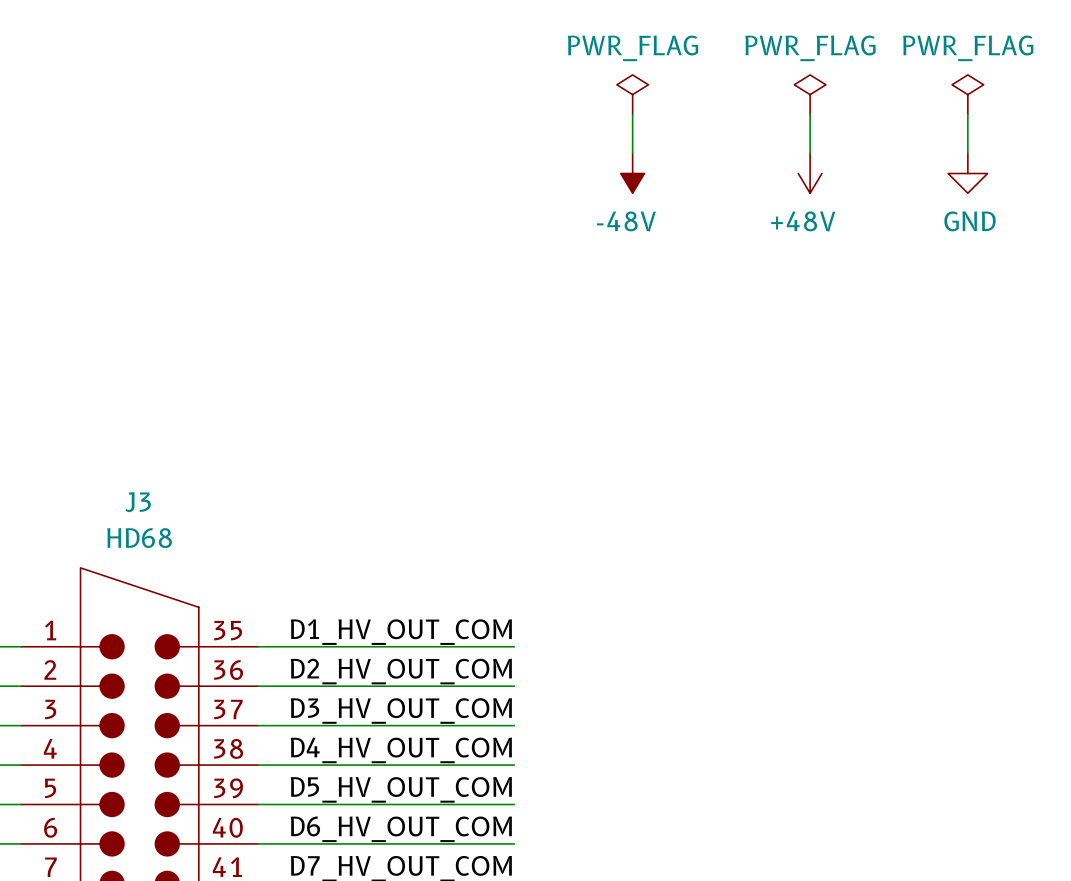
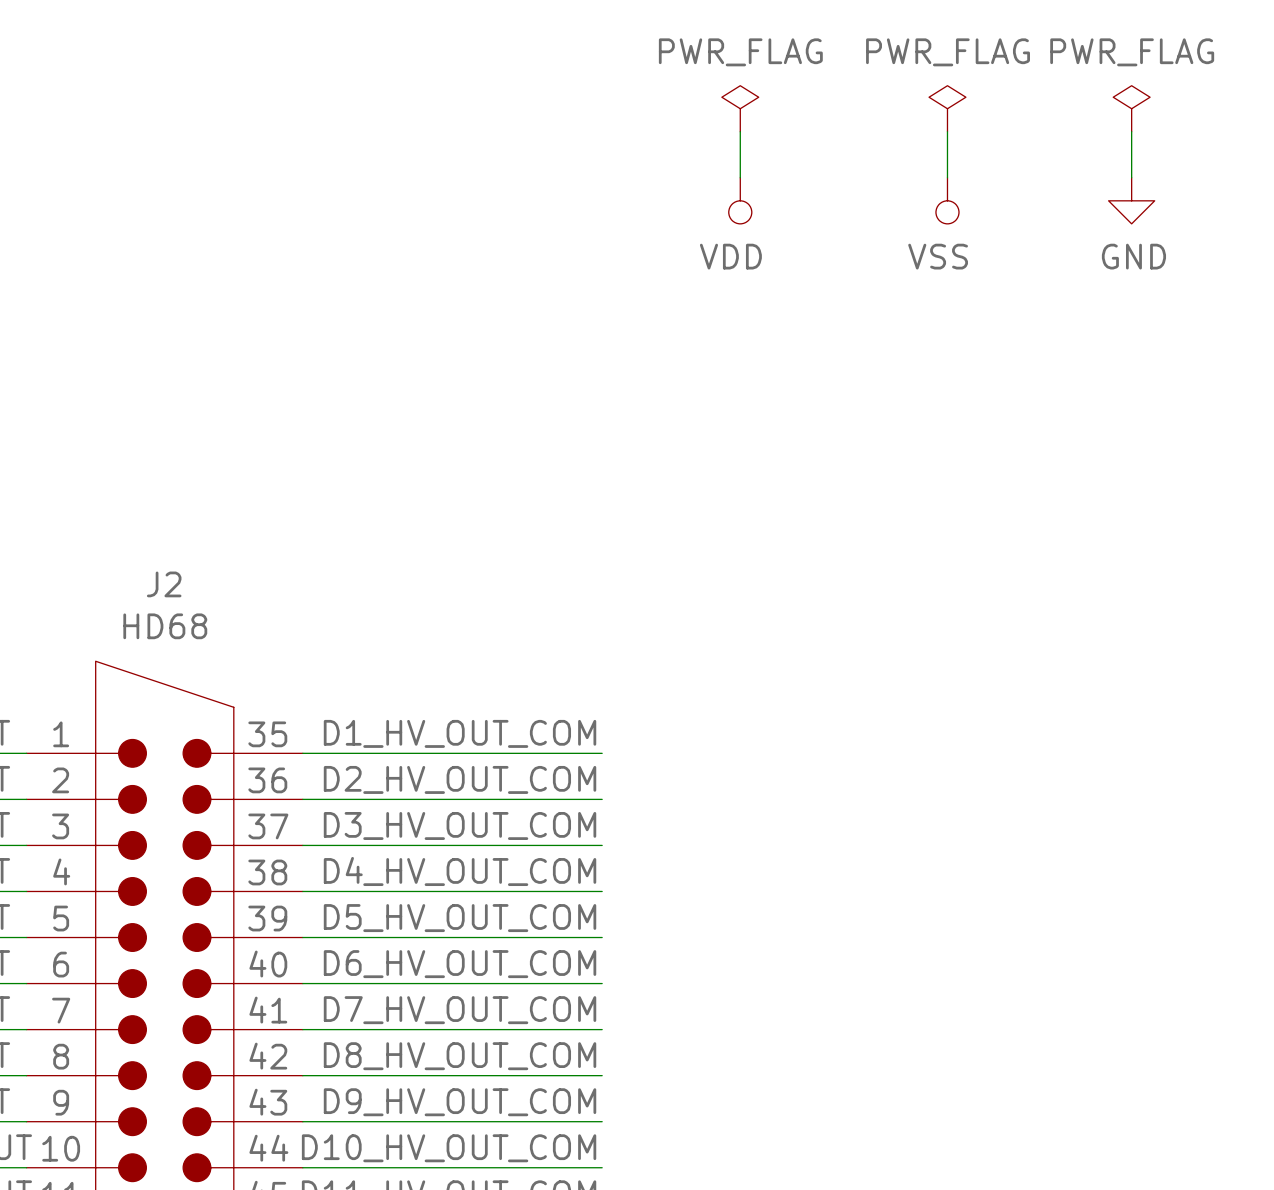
power symbol: -48V (632, 173) -> VDD (740, 200)
power symbol: +48V (810, 173) -> VSS (947, 200)
J3 name: J3 (138, 502) -> J2 (164, 584)

